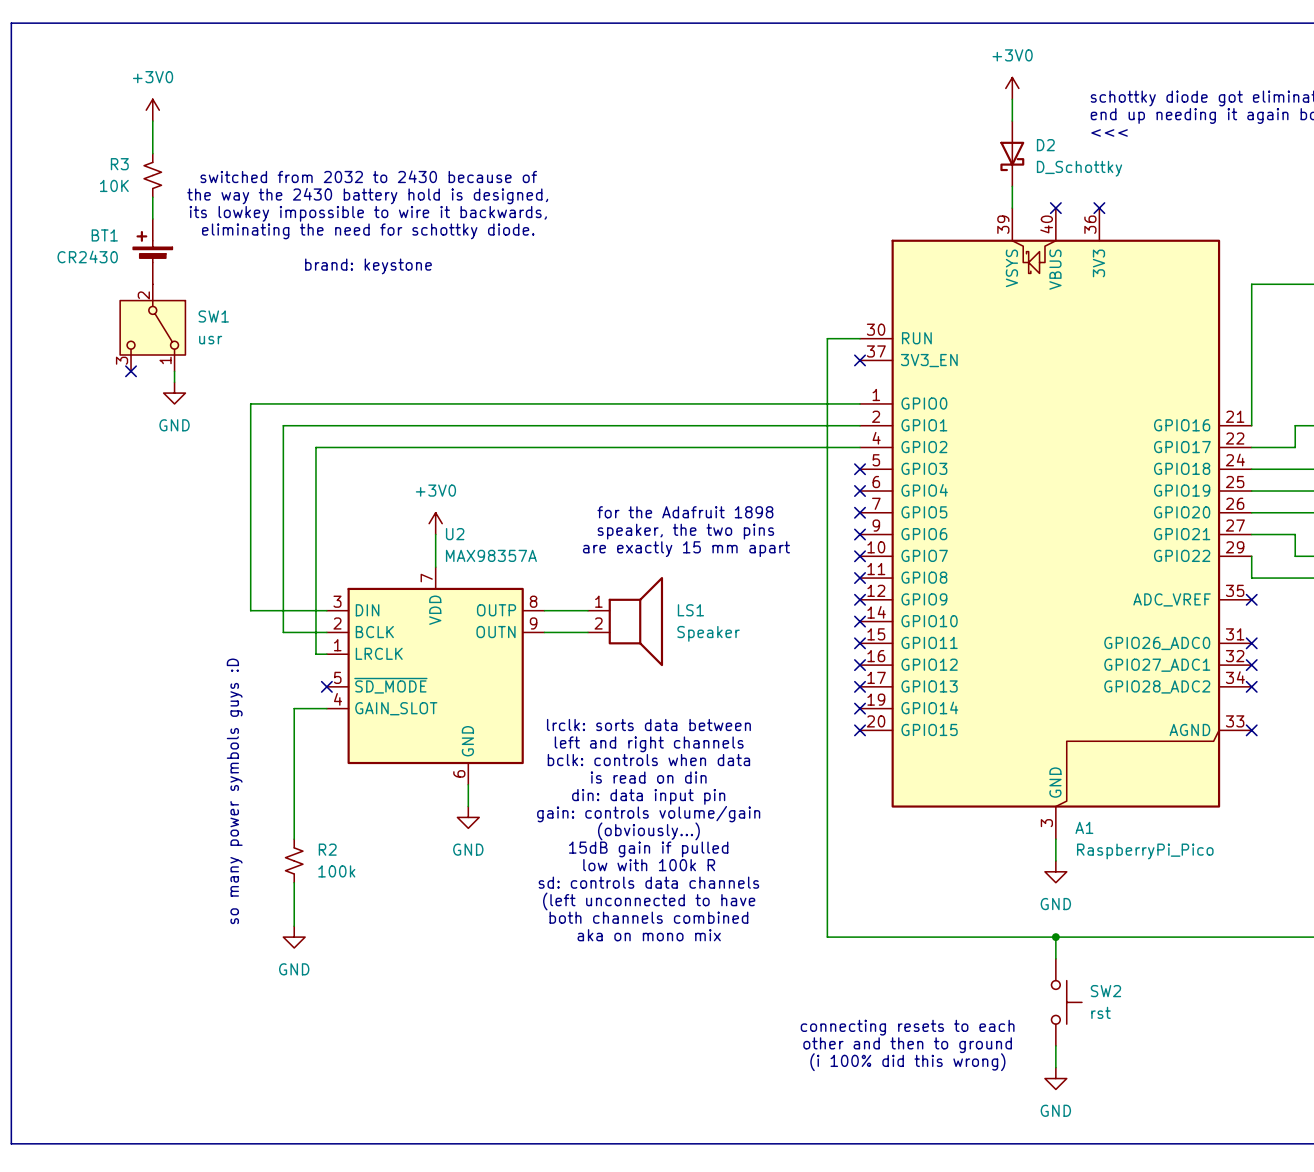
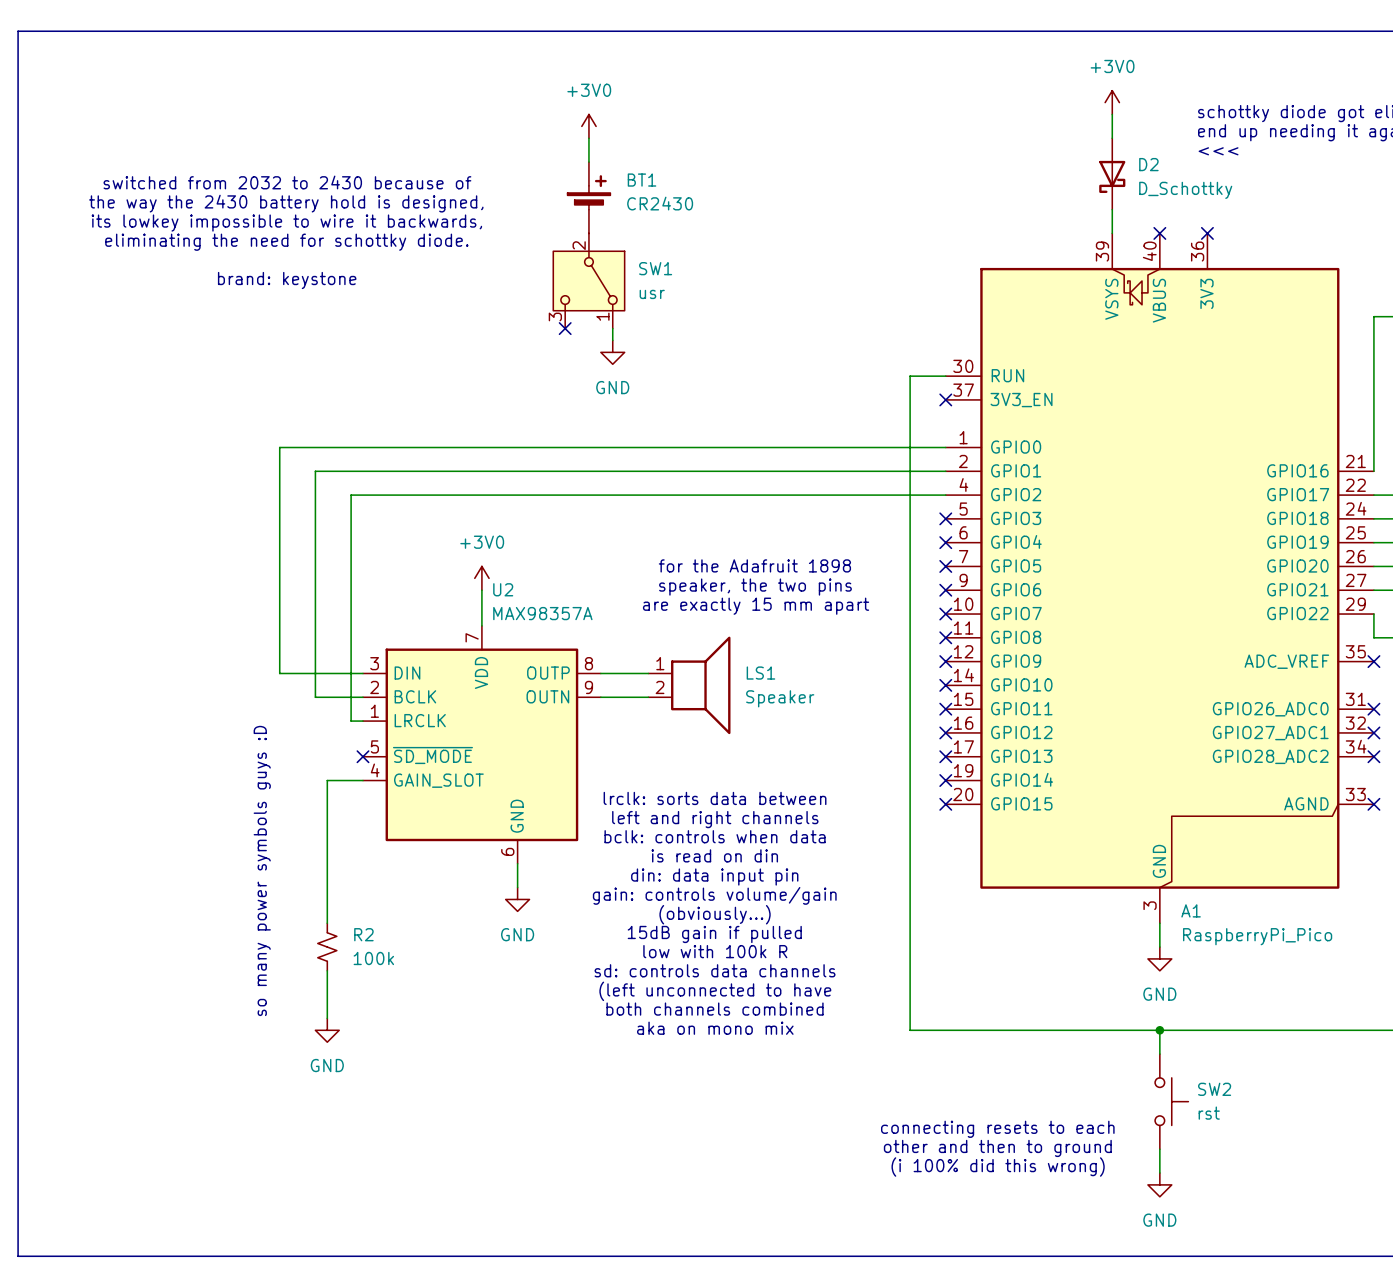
power symbol: +3V0 (152, 110) -> none
power symbol: none -> +3V0 (588, 126)
wire: (152, 121) (152, 153) -> none
wire: none -> (588, 138) (588, 162)
R3: 10K (152, 175) -> none
text position: switched from 2032 to 2430 because of (368, 176) -> switched from 2032 to 2430 because of (287, 182)
text position: the way the 2430 battery hold is designed, (367, 196) -> the way the 2430 battery hold is designed, (286, 203)
wire: (152, 197) (152, 218) -> none
text position: its lowkey impossible to wire it backwards, (368, 213) -> its lowkey impossible to wire it backwards, (286, 223)
text position: eliminating the need for schottky diode. (368, 231) -> eliminating the need for schottky diode. (286, 242)
BT1 flip: as is (152, 246) -> left-right (588, 192)
BT1 position: (152, 251) -> (588, 197)
text position: brand: keystone (368, 266) -> brand: keystone (287, 280)
no-connect mark: none -> (565, 328)
wire: none -> (612, 328) (612, 340)
power symbol: none -> GND (612, 352)
SW1 position: (152, 327) -> (588, 281)
no-connect mark: (131, 371) -> none
wire: (174, 371) (174, 382) -> none
power symbol: GND (174, 393) -> none

